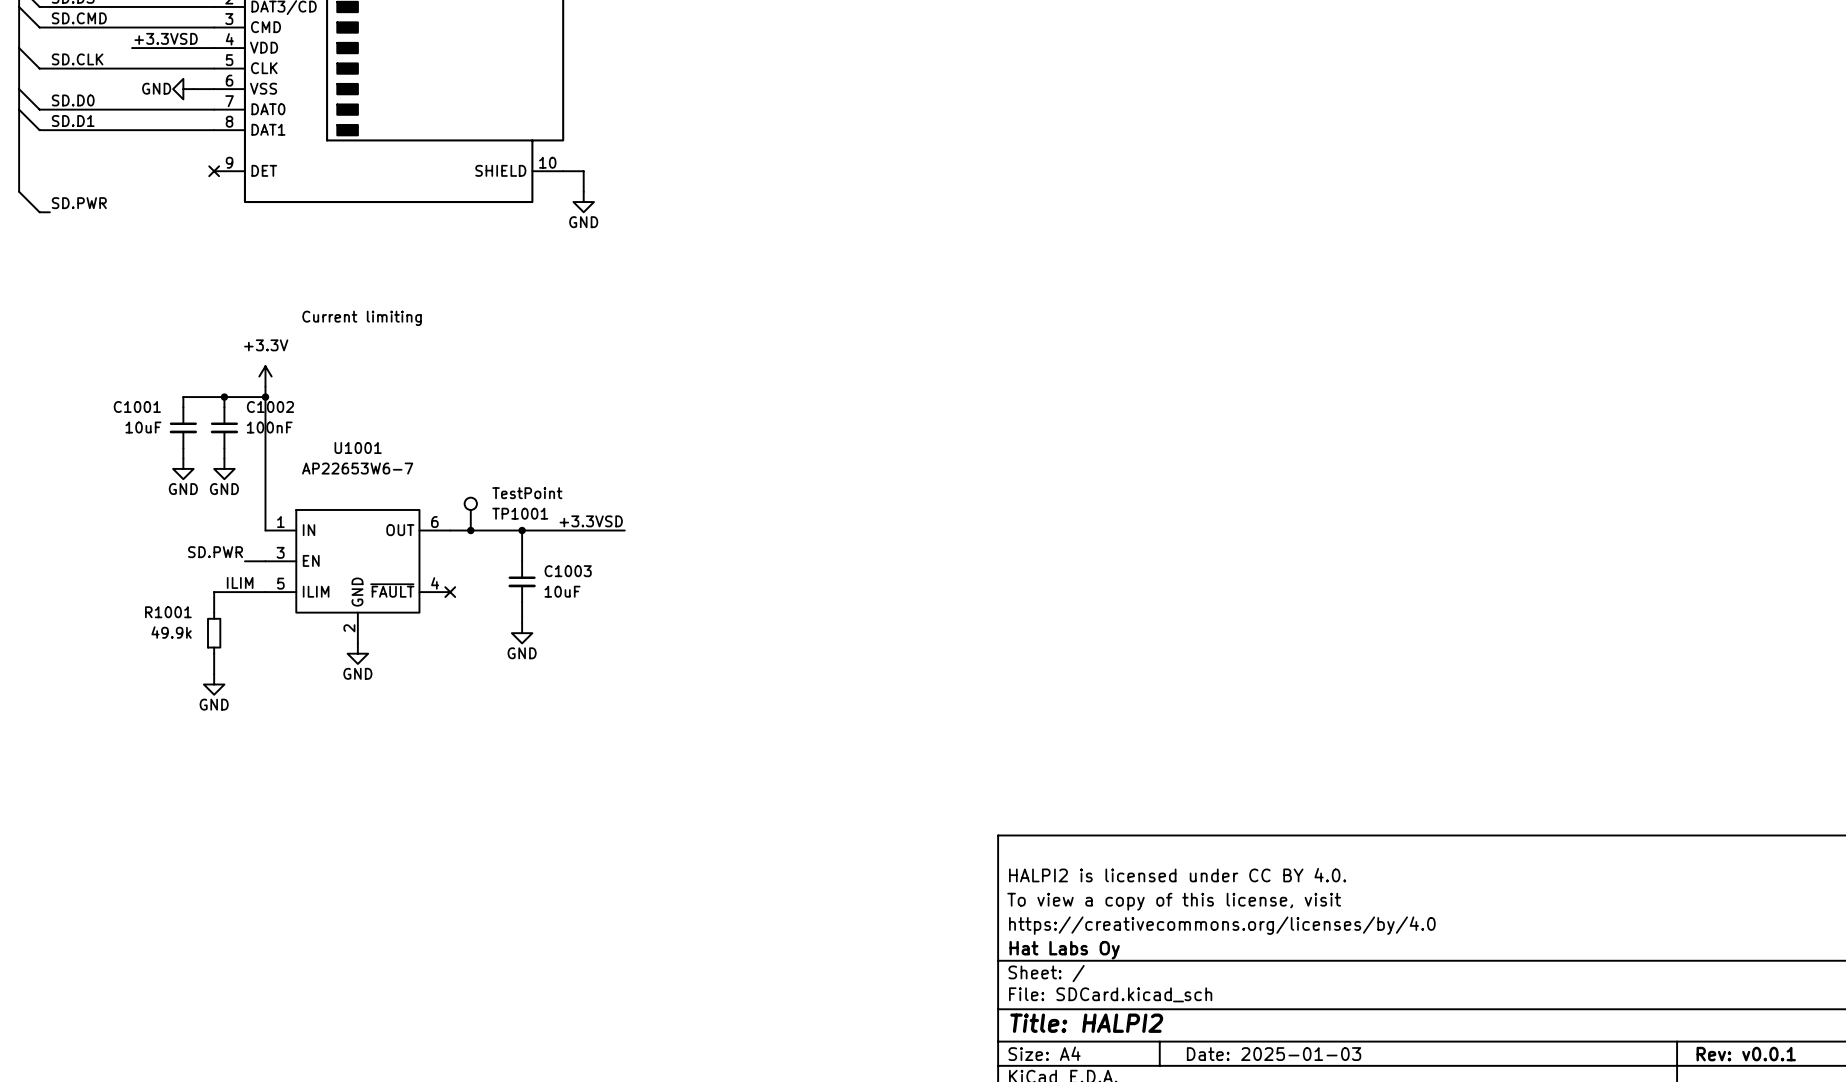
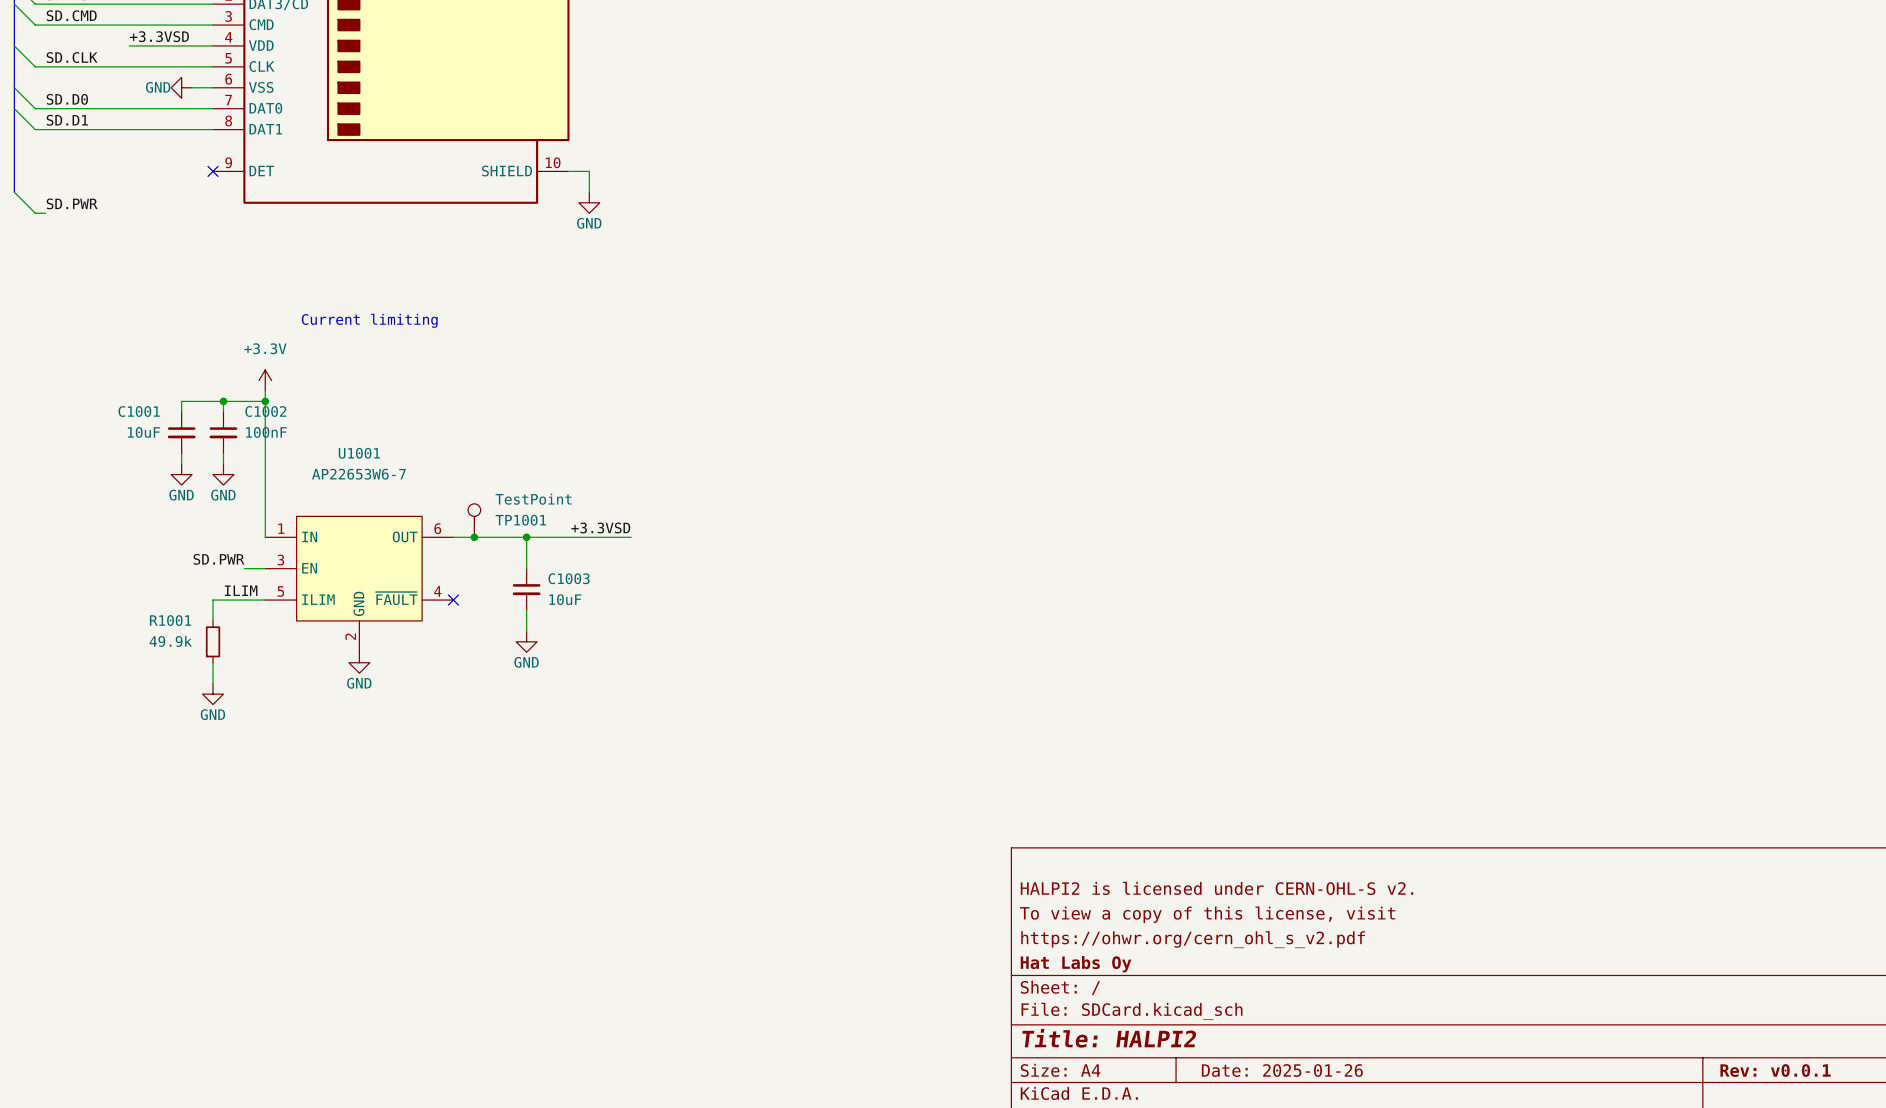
title block: HALPI2 is licensed under CC BY 4.0. (1177, 875) -> HALPI2 is licensed under CERN-OHL-S v2. (1216, 888)
title block: https://creativecommons.org/licenses/by/4.0 (1222, 925) -> https://ohwr.org/cern_ohl_s_v2.pdf (1193, 939)
title block: Date: 2025-01-03 (1274, 1054) -> Date: 2025-01-26 (1282, 1070)

